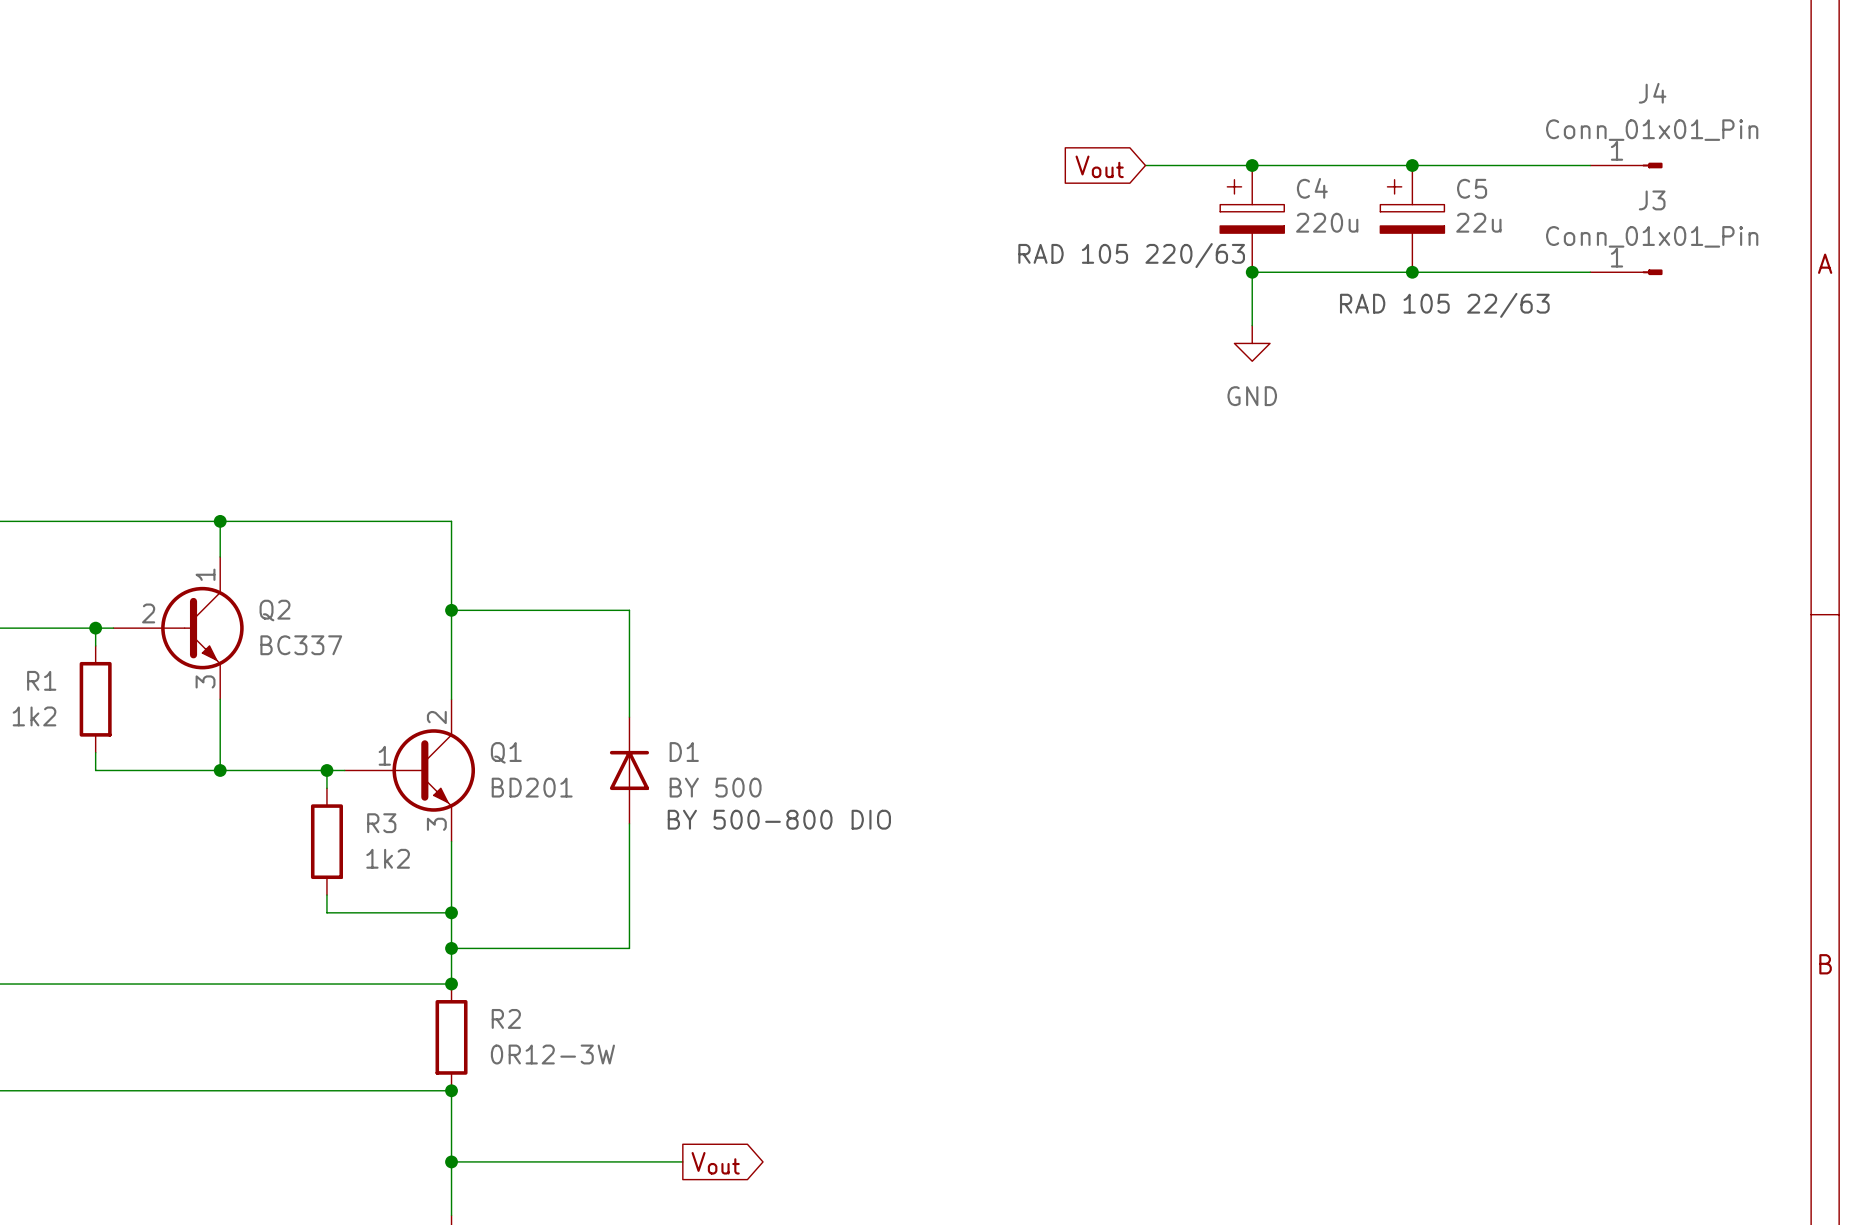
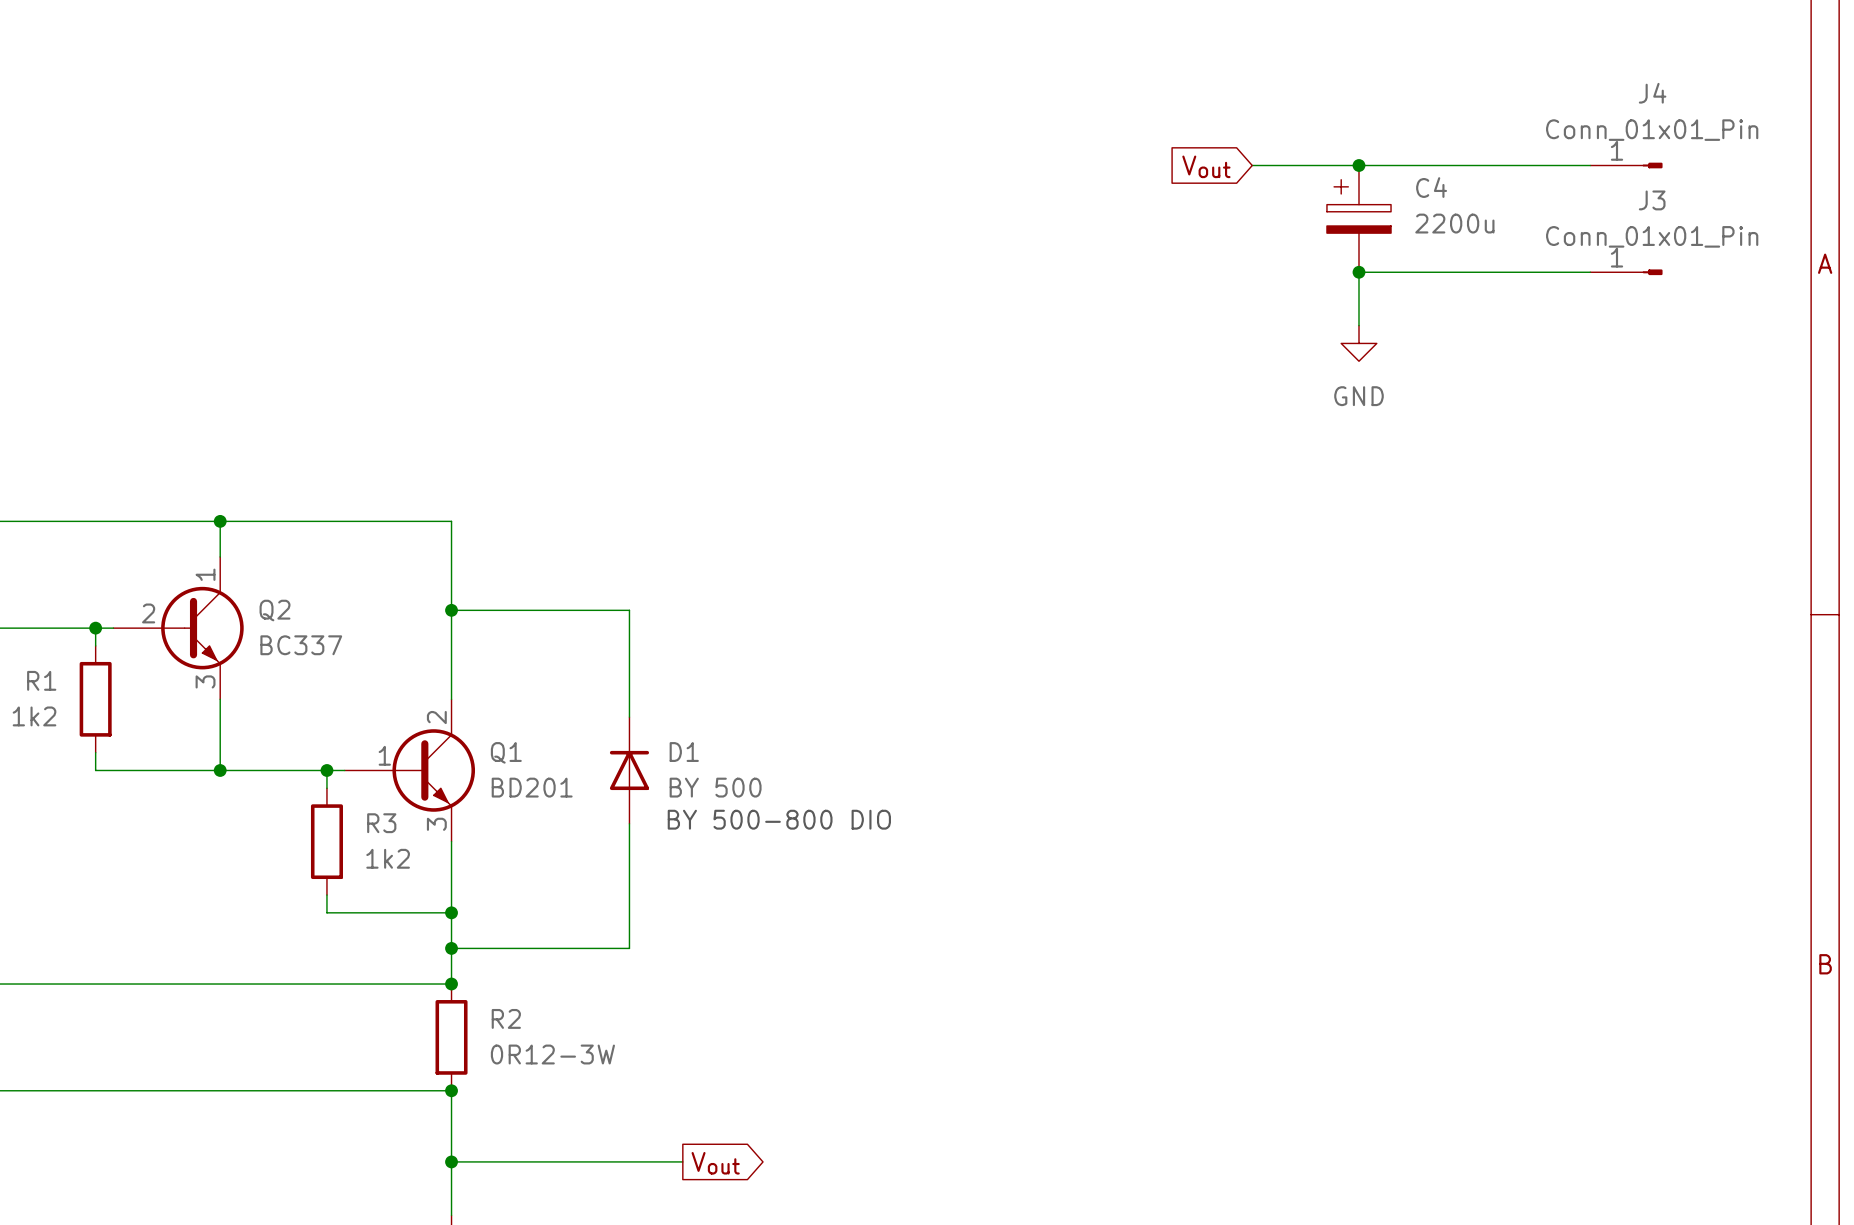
wire: (1145, 165) (1252, 165) -> none
junction: (1252, 165) -> none
junction: none -> (1358, 165)
junction: (1412, 165) -> none
global label position: Vout (1099, 166) -> Vout (1206, 166)
C4 name position: C4 (1312, 188) -> C4 (1431, 187)
C4 position: (1252, 218) -> (1358, 218)
C5: 22u (1412, 218) -> none
C4 value: 220u (1327, 222) -> 2200u (1454, 223)
text: RAD 105 220/63 (1131, 255) -> none
junction: (1252, 272) -> none
wire: (1358, 272) (1252, 272) (1252, 325) -> (1358, 272) (1358, 325)
junction: none -> (1358, 272)
junction: (1412, 272) -> none
text: RAD 105 22/63 (1444, 305) -> none
power symbol position: GND (1252, 343) -> GND (1358, 343)

